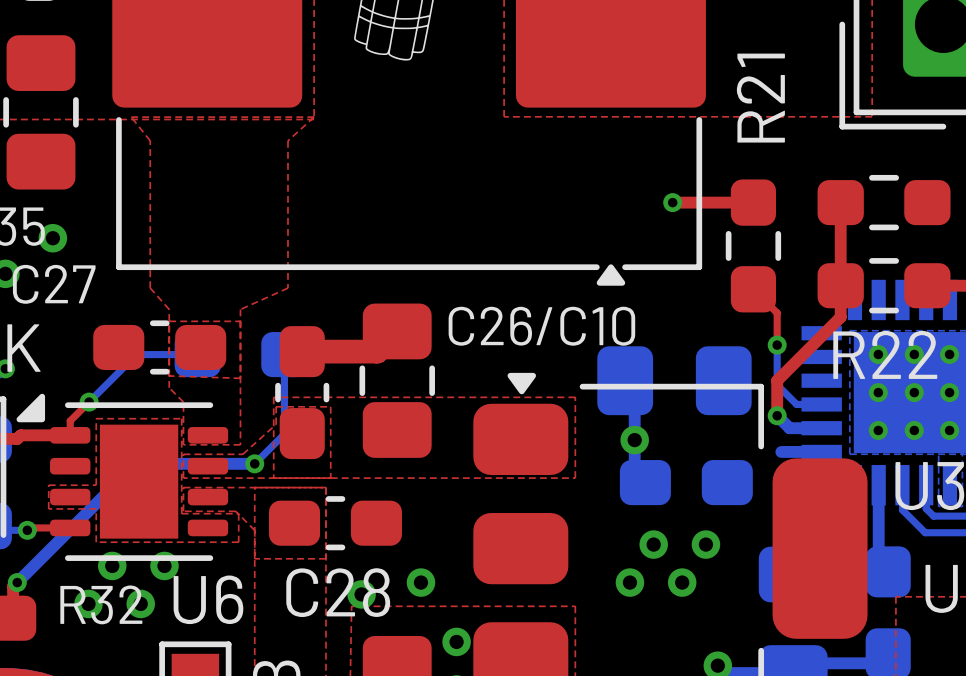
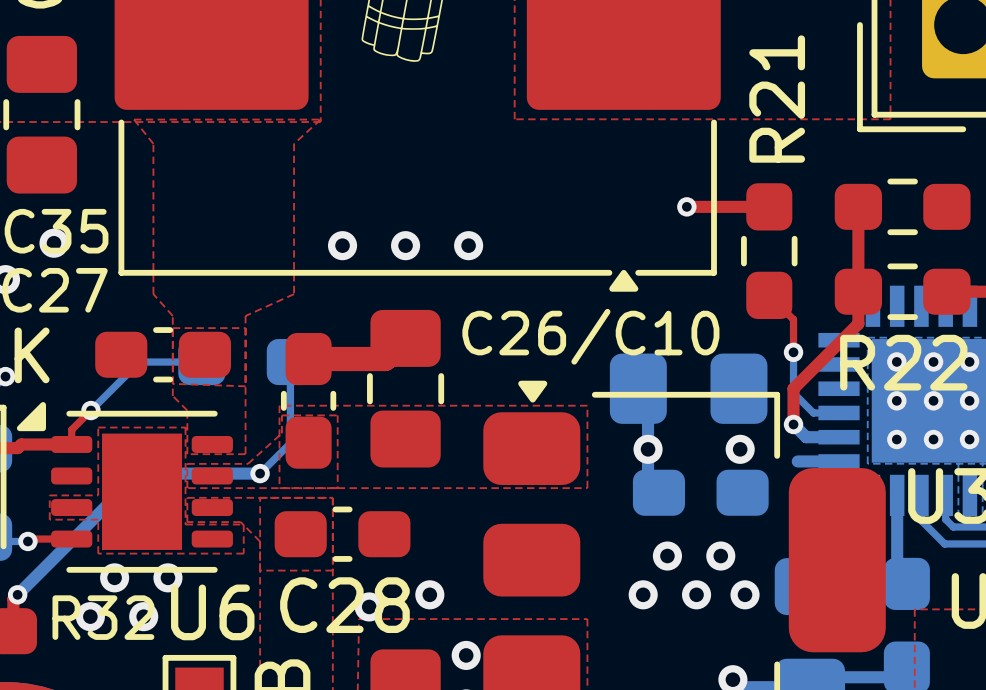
via: none -> (342, 245)
via: none -> (405, 245)
via: none -> (468, 245)
via: none -> (740, 449)
via: none -> (745, 594)

